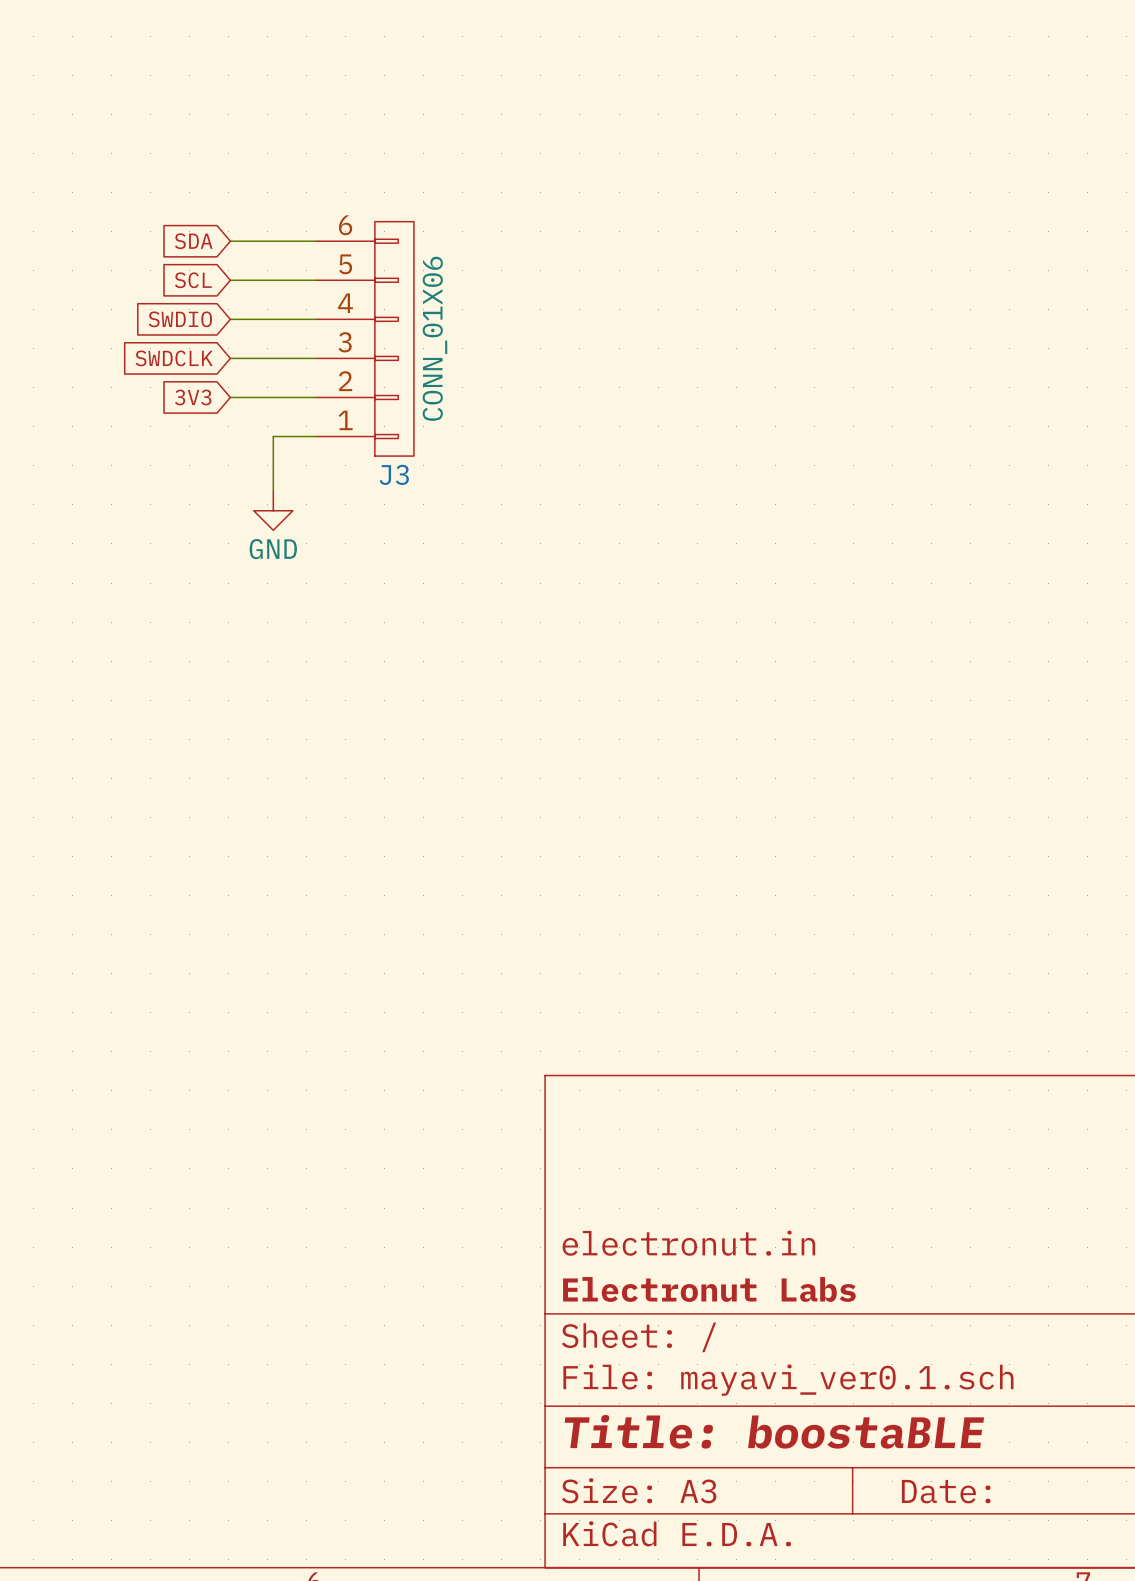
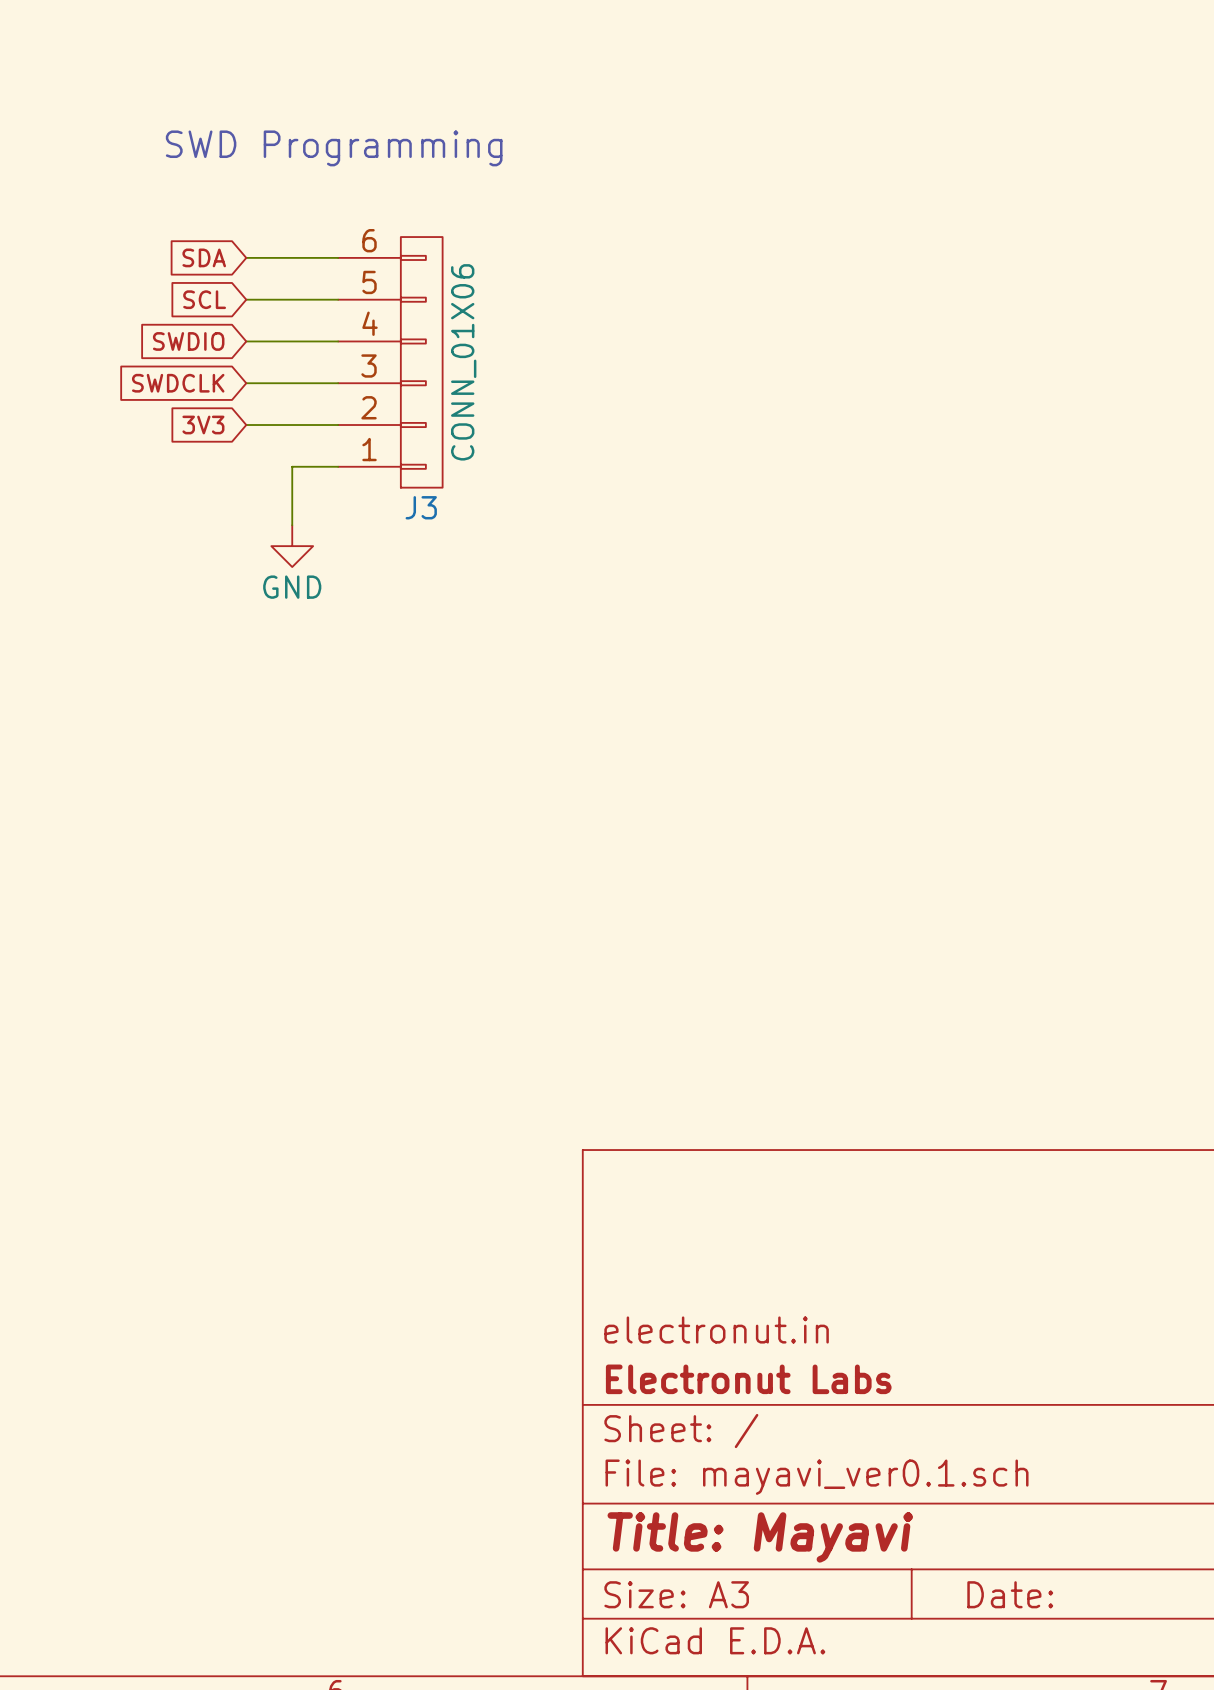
text: none -> SWD Programming (334, 148)
title block: Title: boostaBLE (774, 1431) -> Title: Mayavi (760, 1537)

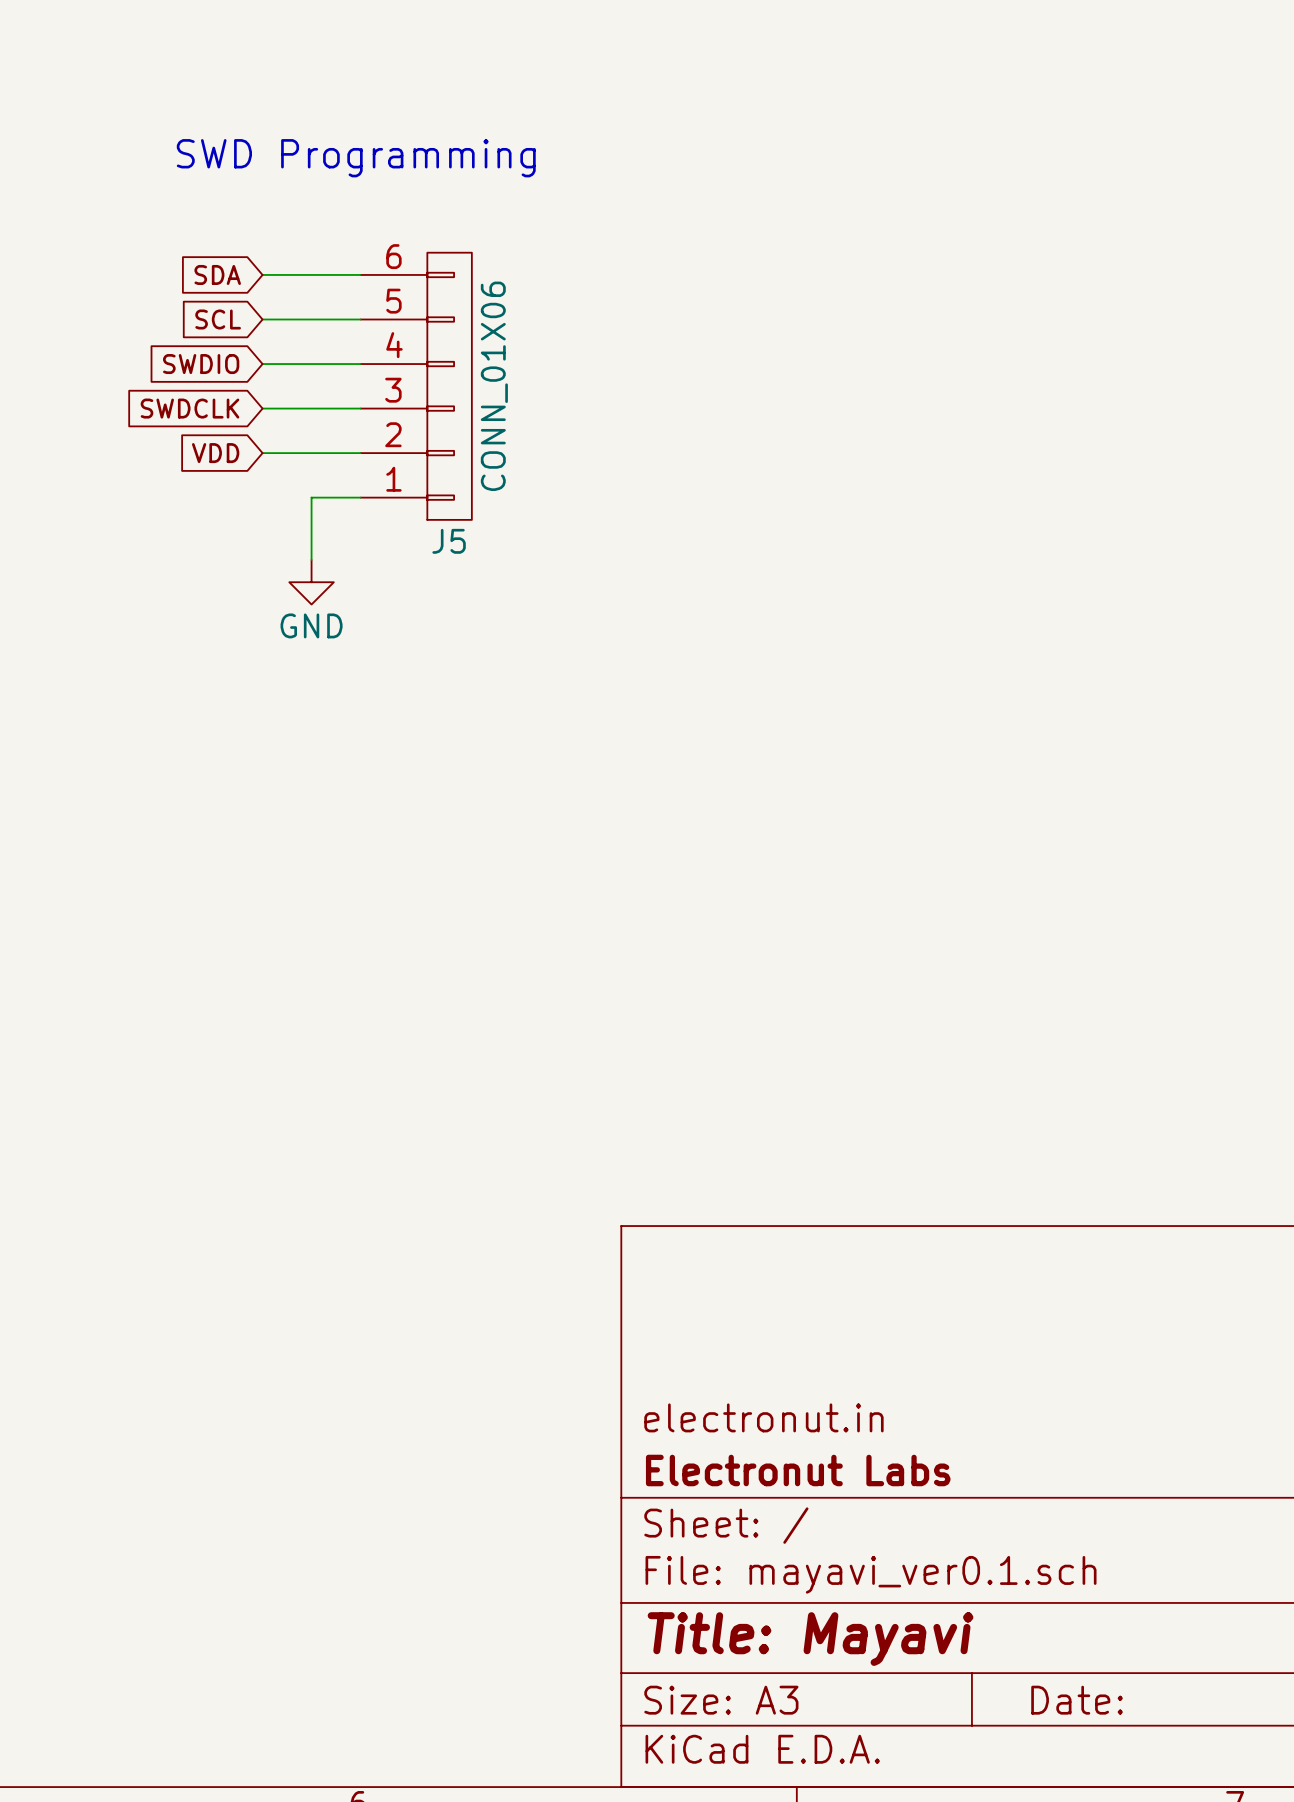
global label: 3V3 (203, 425) -> VDD (215, 453)
J3 name: J3 (421, 507) -> J5 (449, 541)

